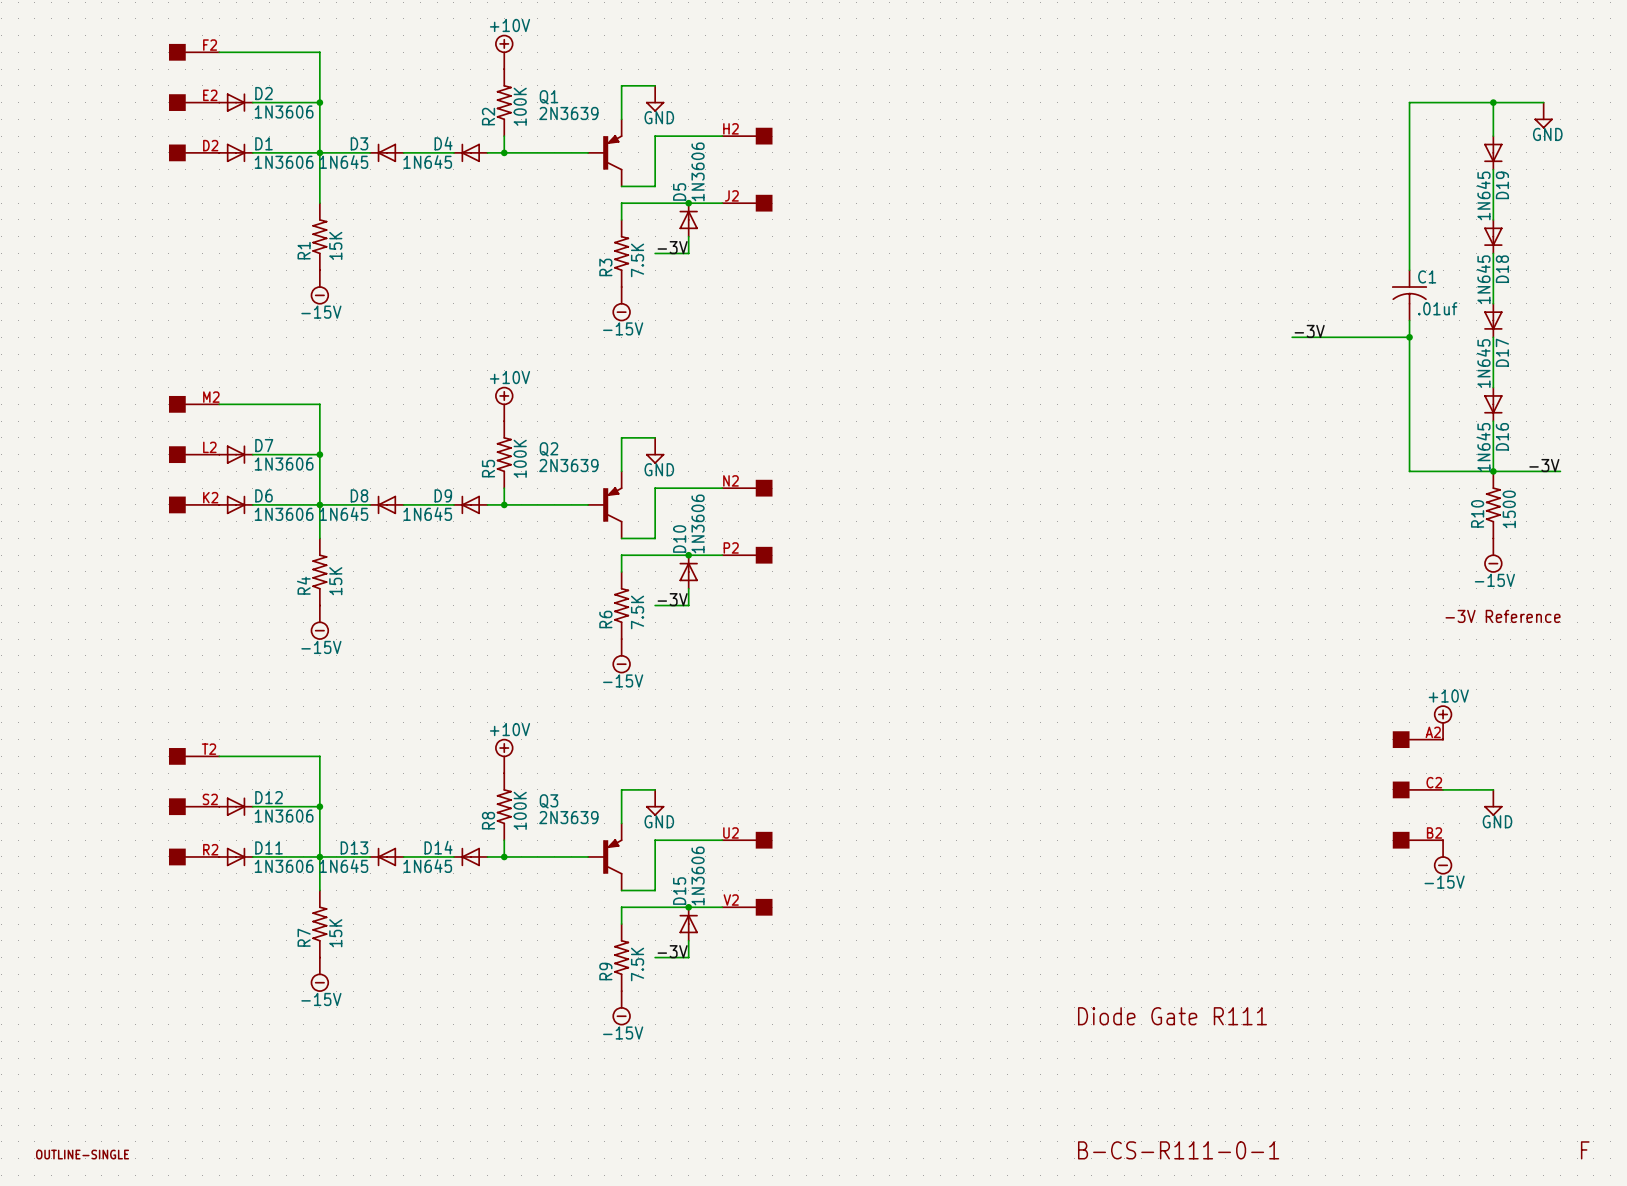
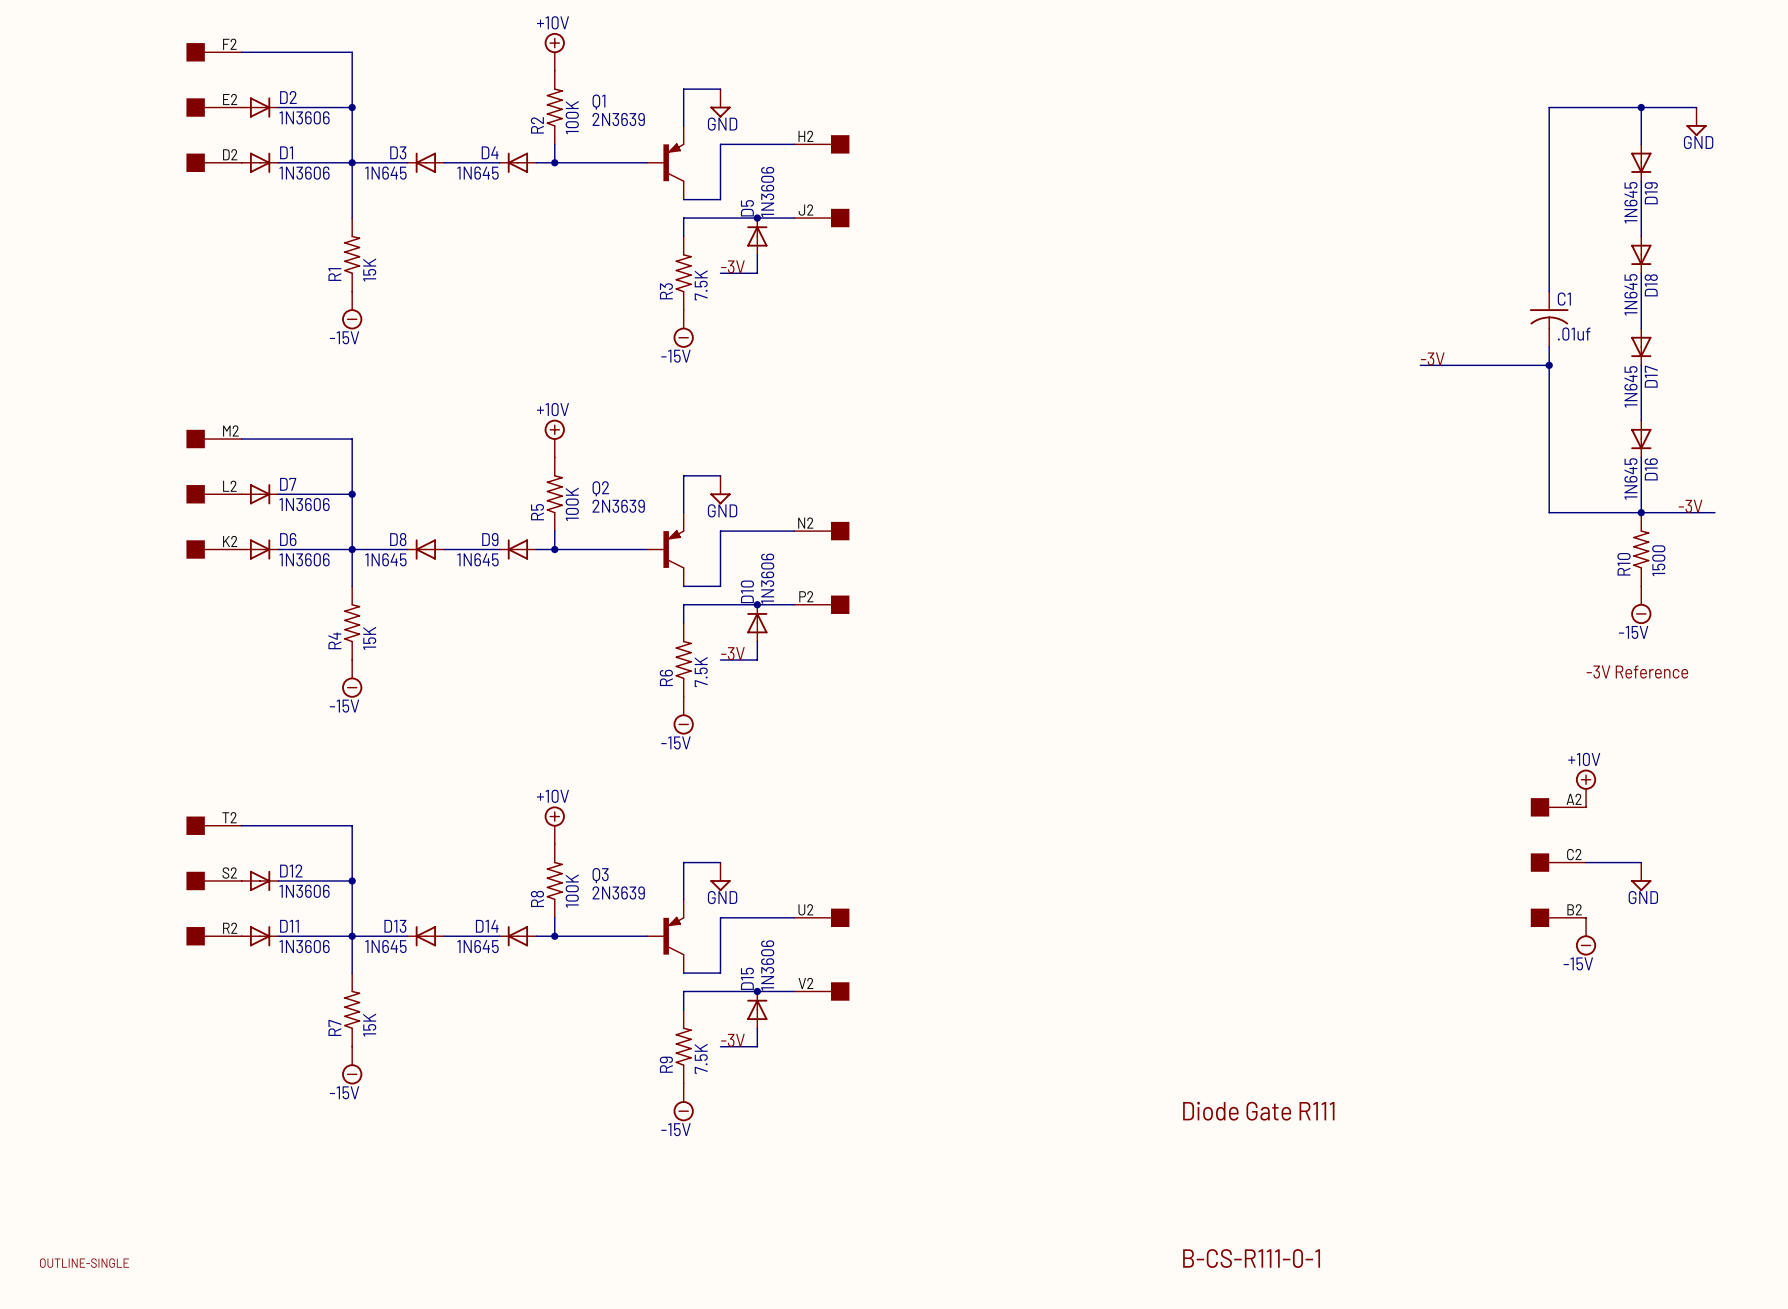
text: F (1585, 1150) -> none

